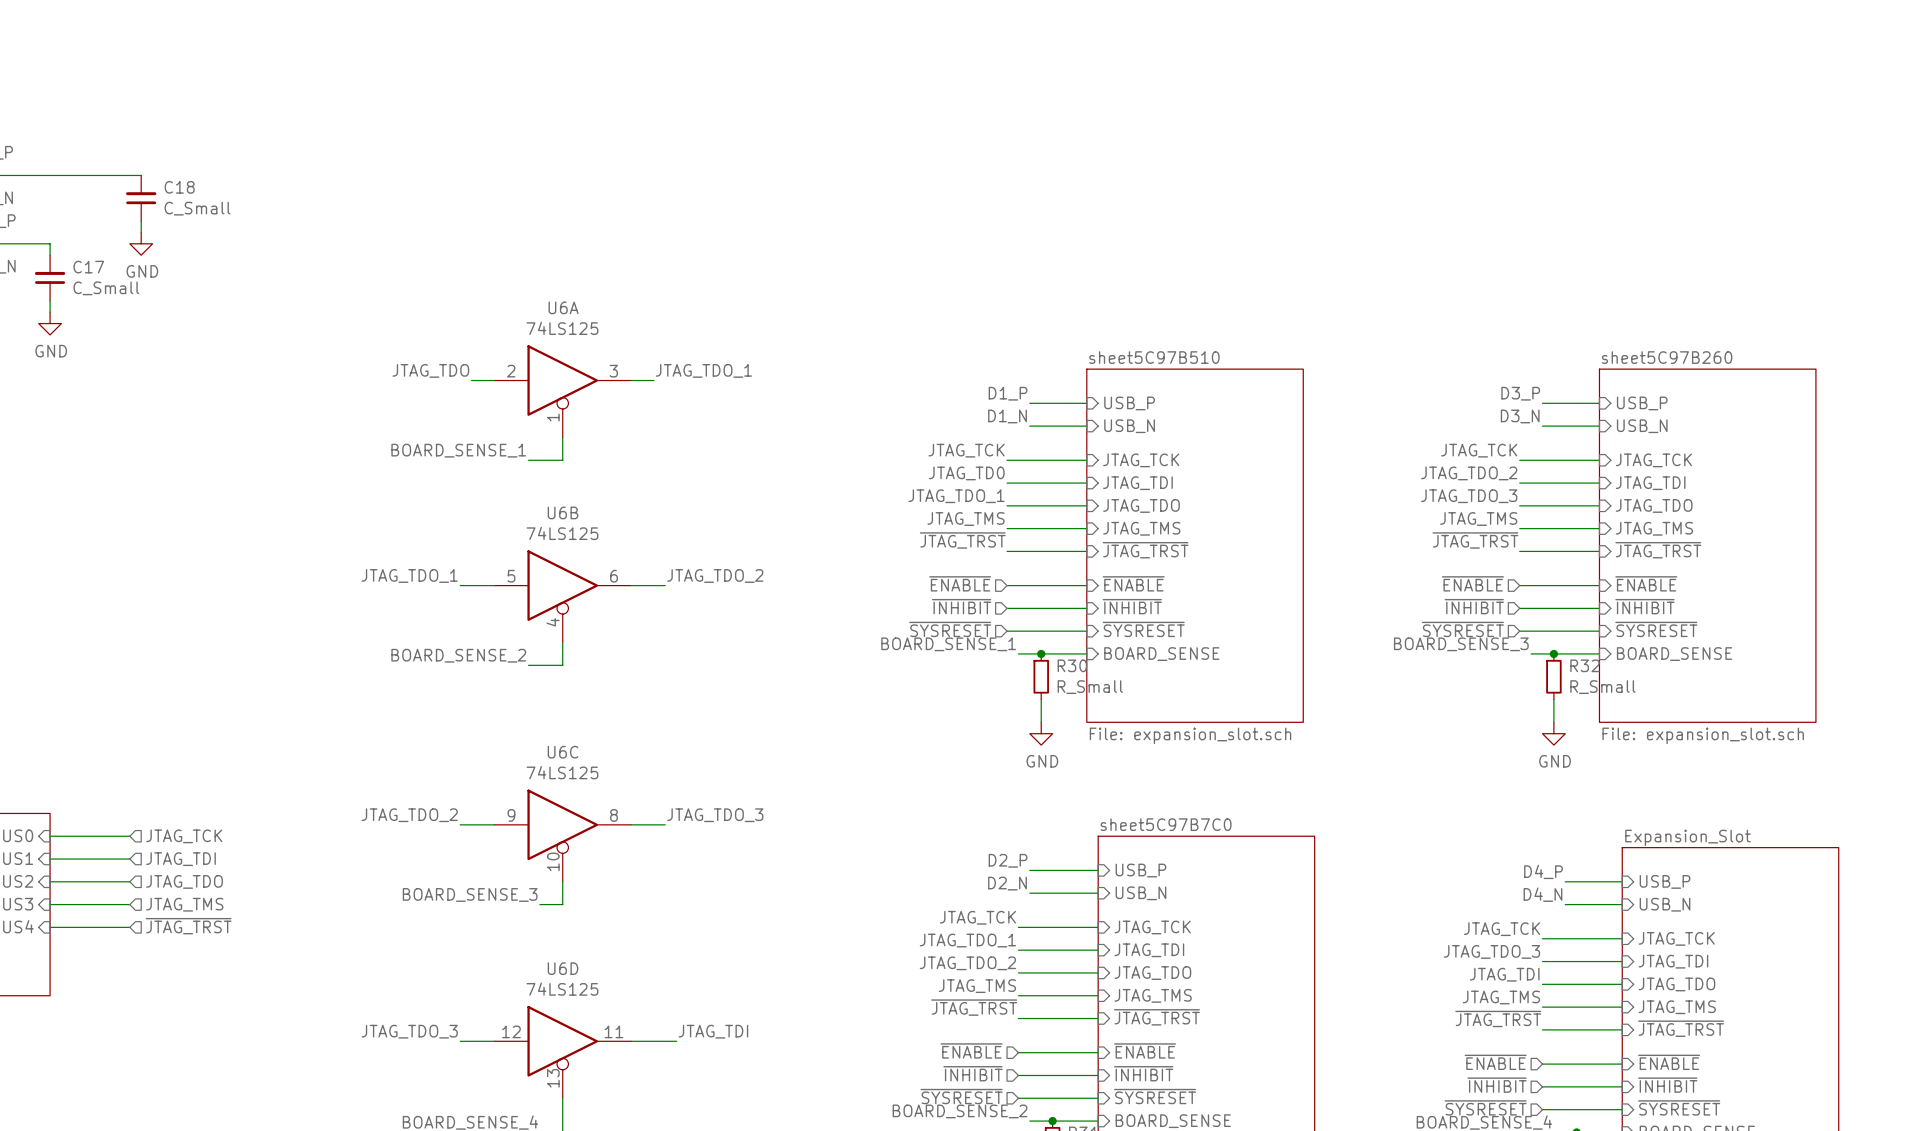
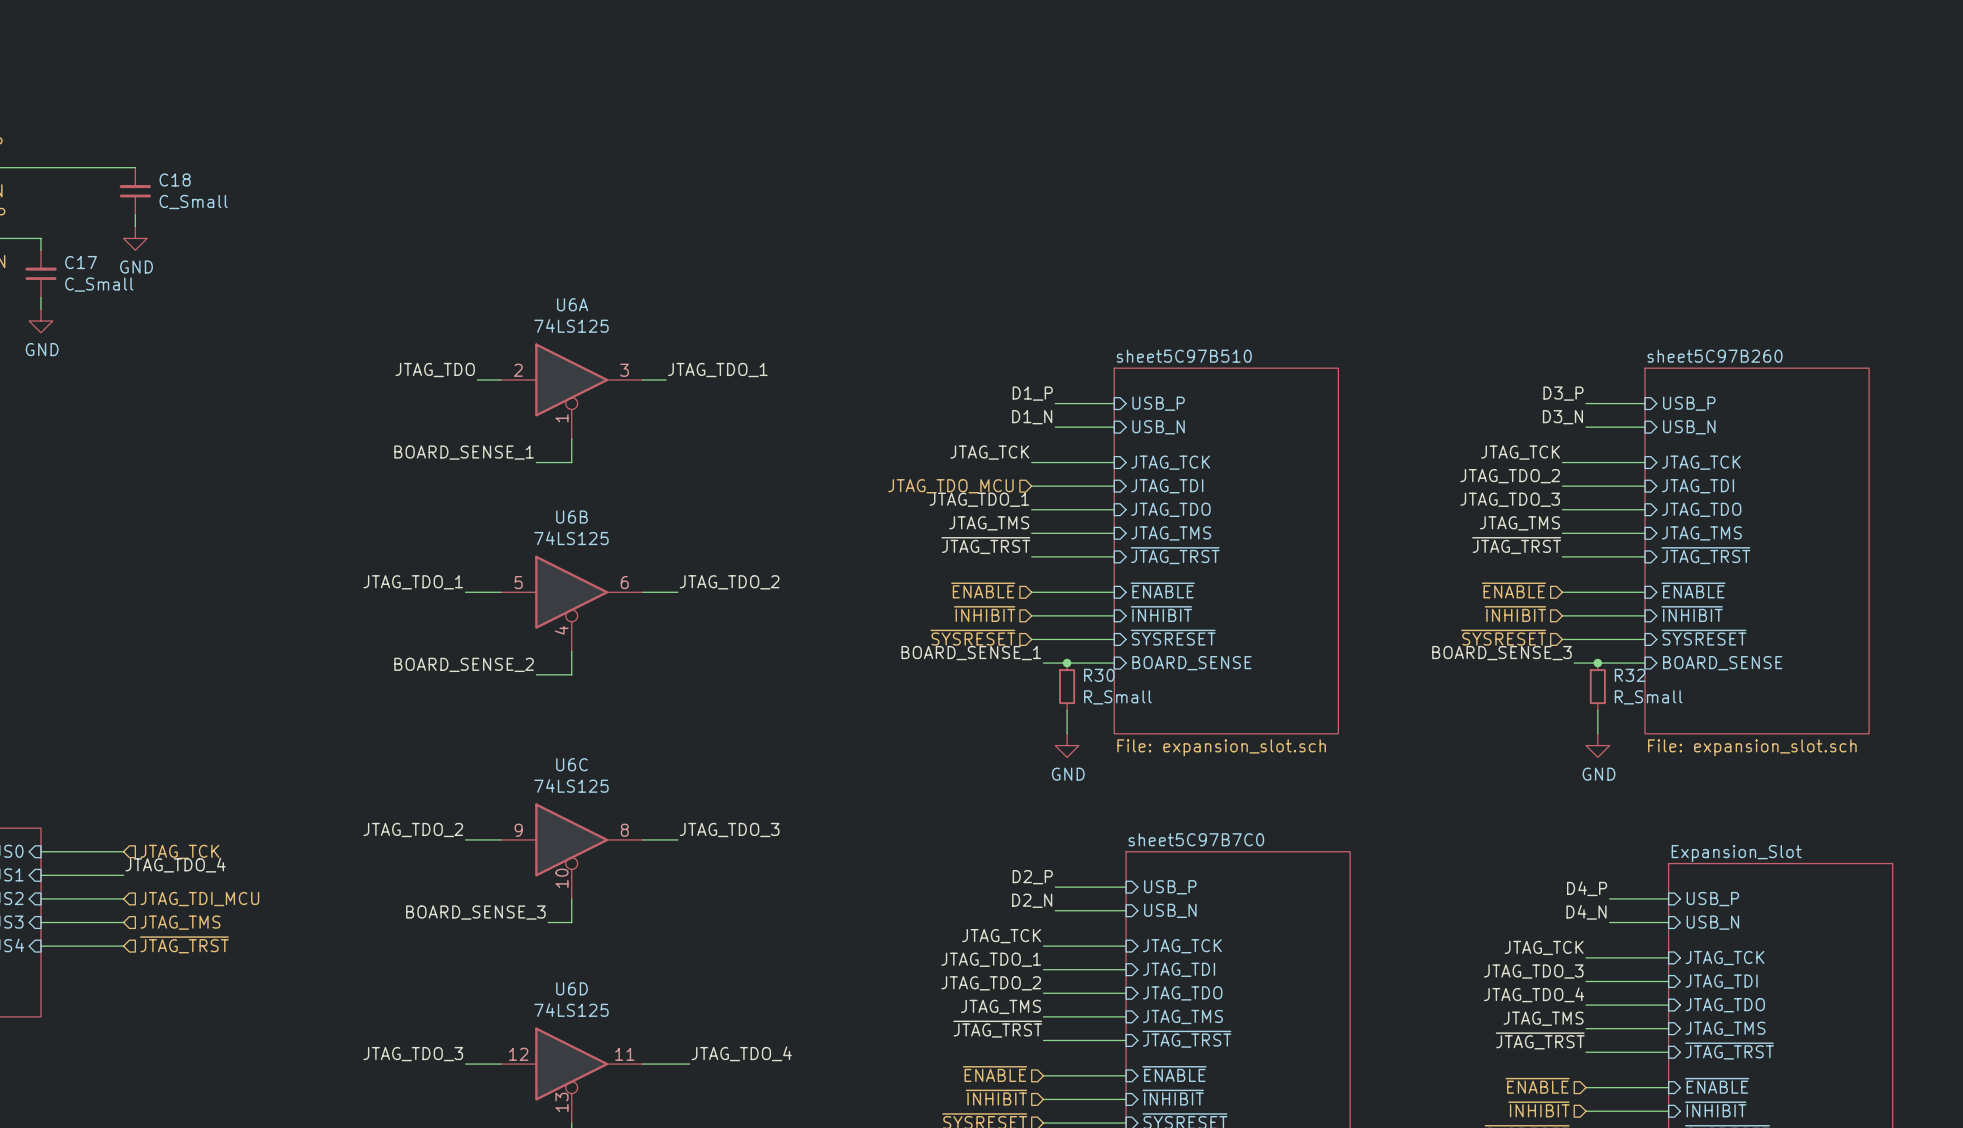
label: JTAG_TD0 (966, 473) -> none
hierarchical label: none -> JTAG_TDO_MCU (950, 486)
label: none -> JTAG_TDO_4 (175, 865)
hierarchical label: JTAG_TDI (180, 859) -> none
hierarchical label: JTAG_TDO (184, 881) -> JTAG_TDI_MCU (199, 899)
label: JTAG_TDI (1504, 974) -> JTAG_TDO_4 (1534, 994)
label: JTAG_TDI (713, 1031) -> JTAG_TDO_4 (741, 1053)

